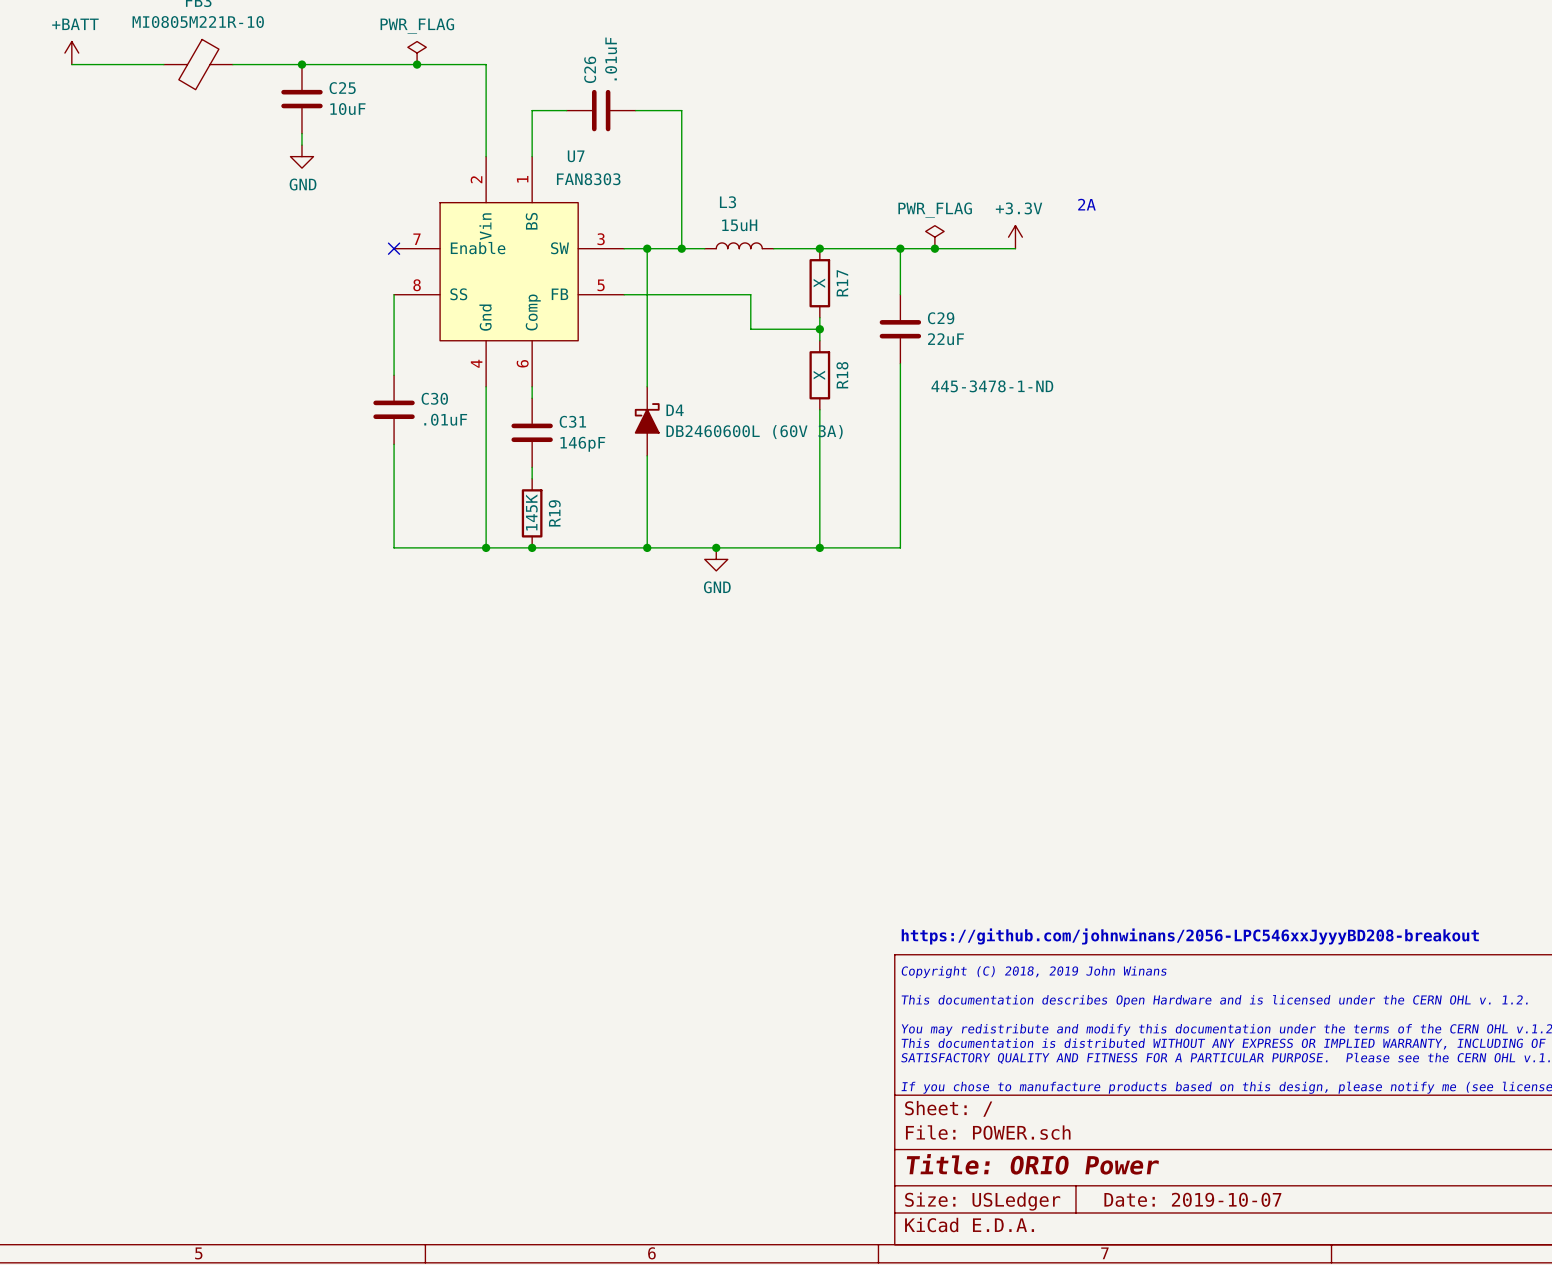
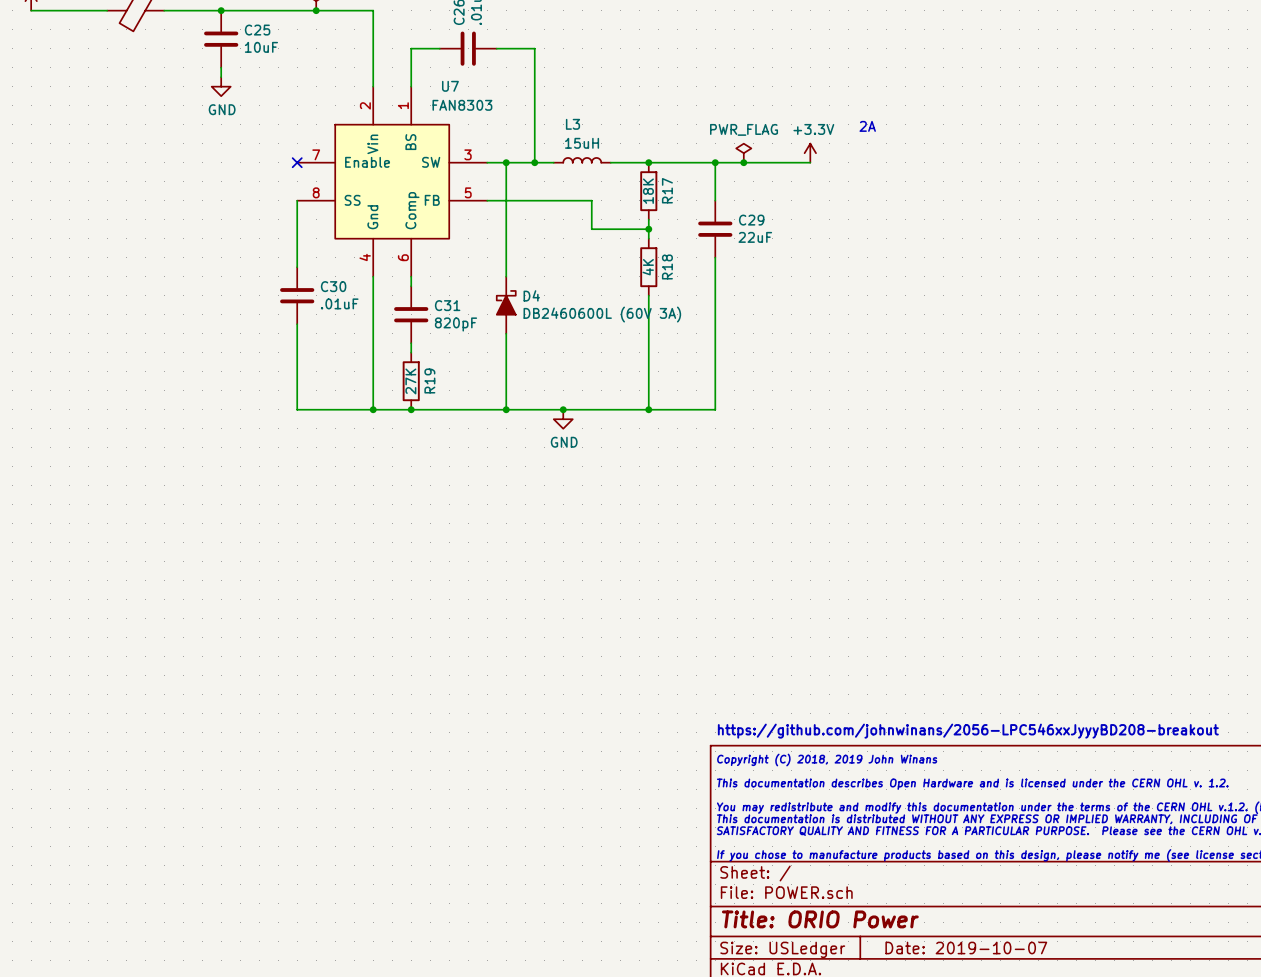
R17 value: X (819, 283) -> 18K (648, 191)
R18 value: X (819, 375) -> 4K (648, 267)
C29 text: 445-3478-1-ND (992, 386) -> none
C31 value: 146pF (582, 444) -> 820pF (456, 324)
R19 value: 145K (531, 512) -> 27K (410, 381)

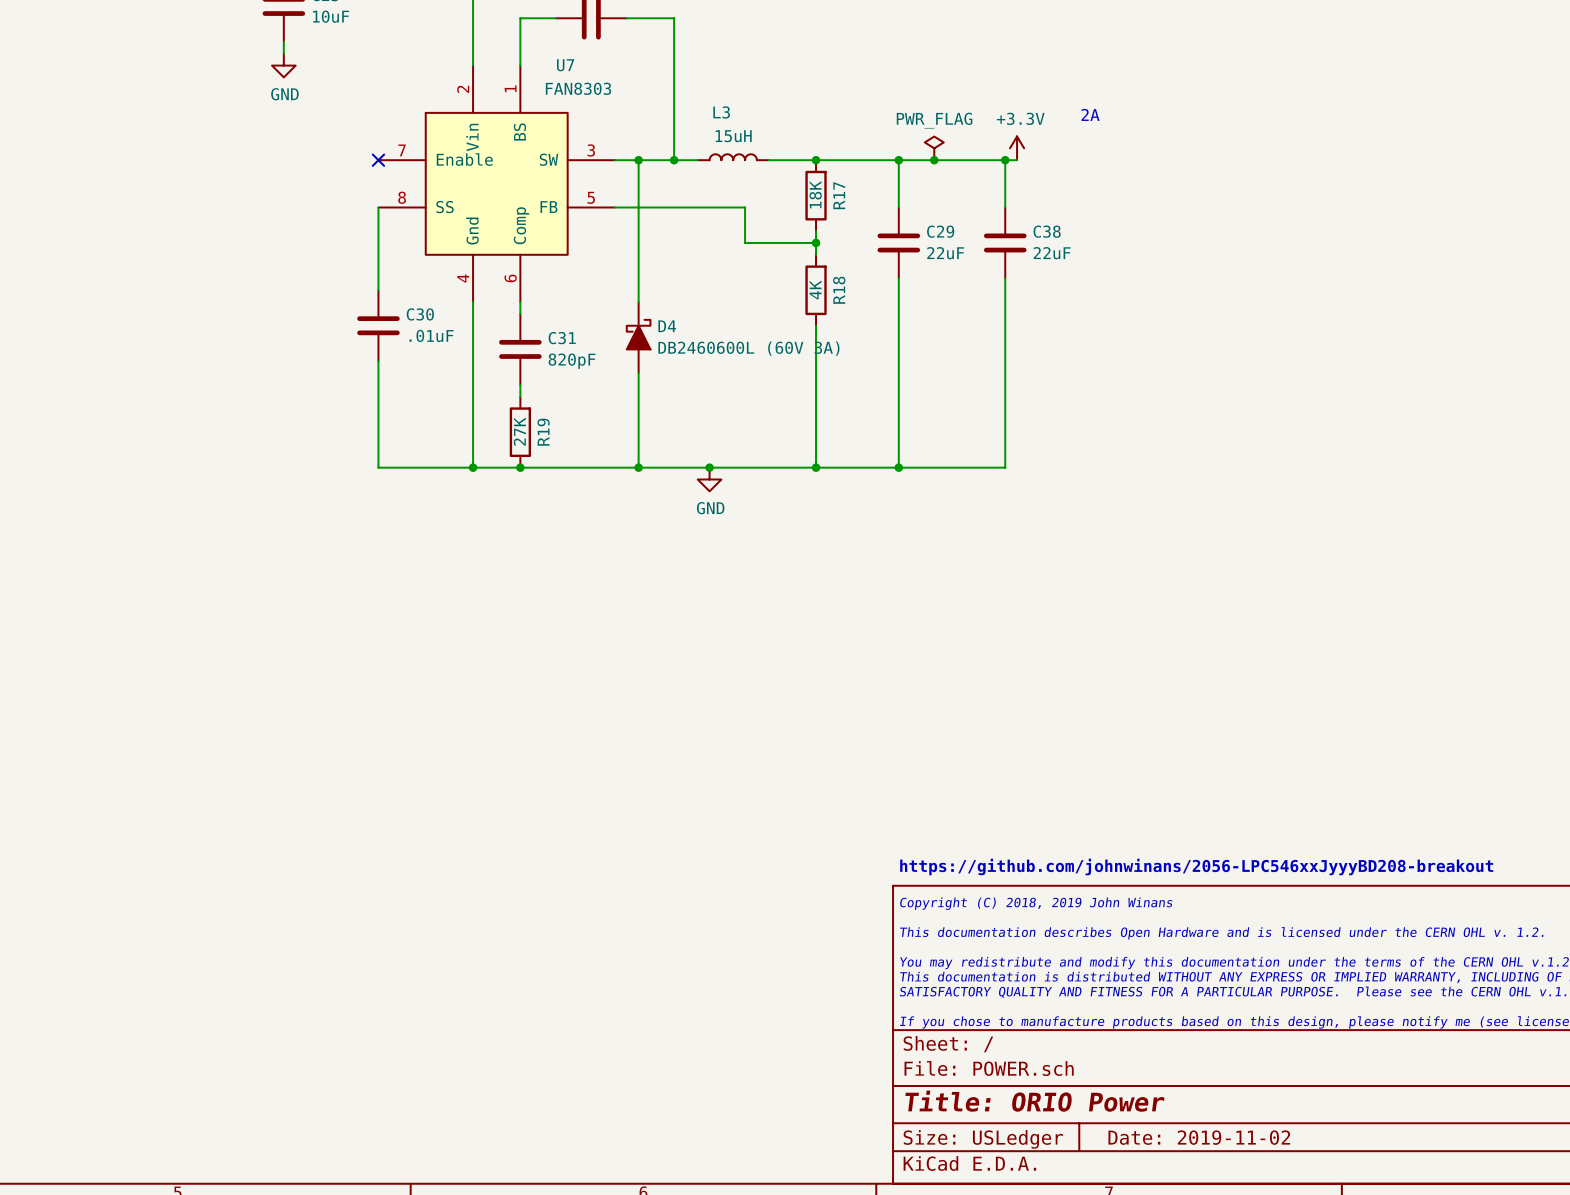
wire: none -> (1005, 160) (1005, 207)
junction: none -> (1005, 160)
C38: none -> 22uF (1005, 242)
wire: none -> (1005, 278) (1005, 467) (898, 467)
junction: none -> (898, 467)
title block: Date: 2019-10-07 (966, 948) -> Date: 2019-11-02 (1199, 1137)

